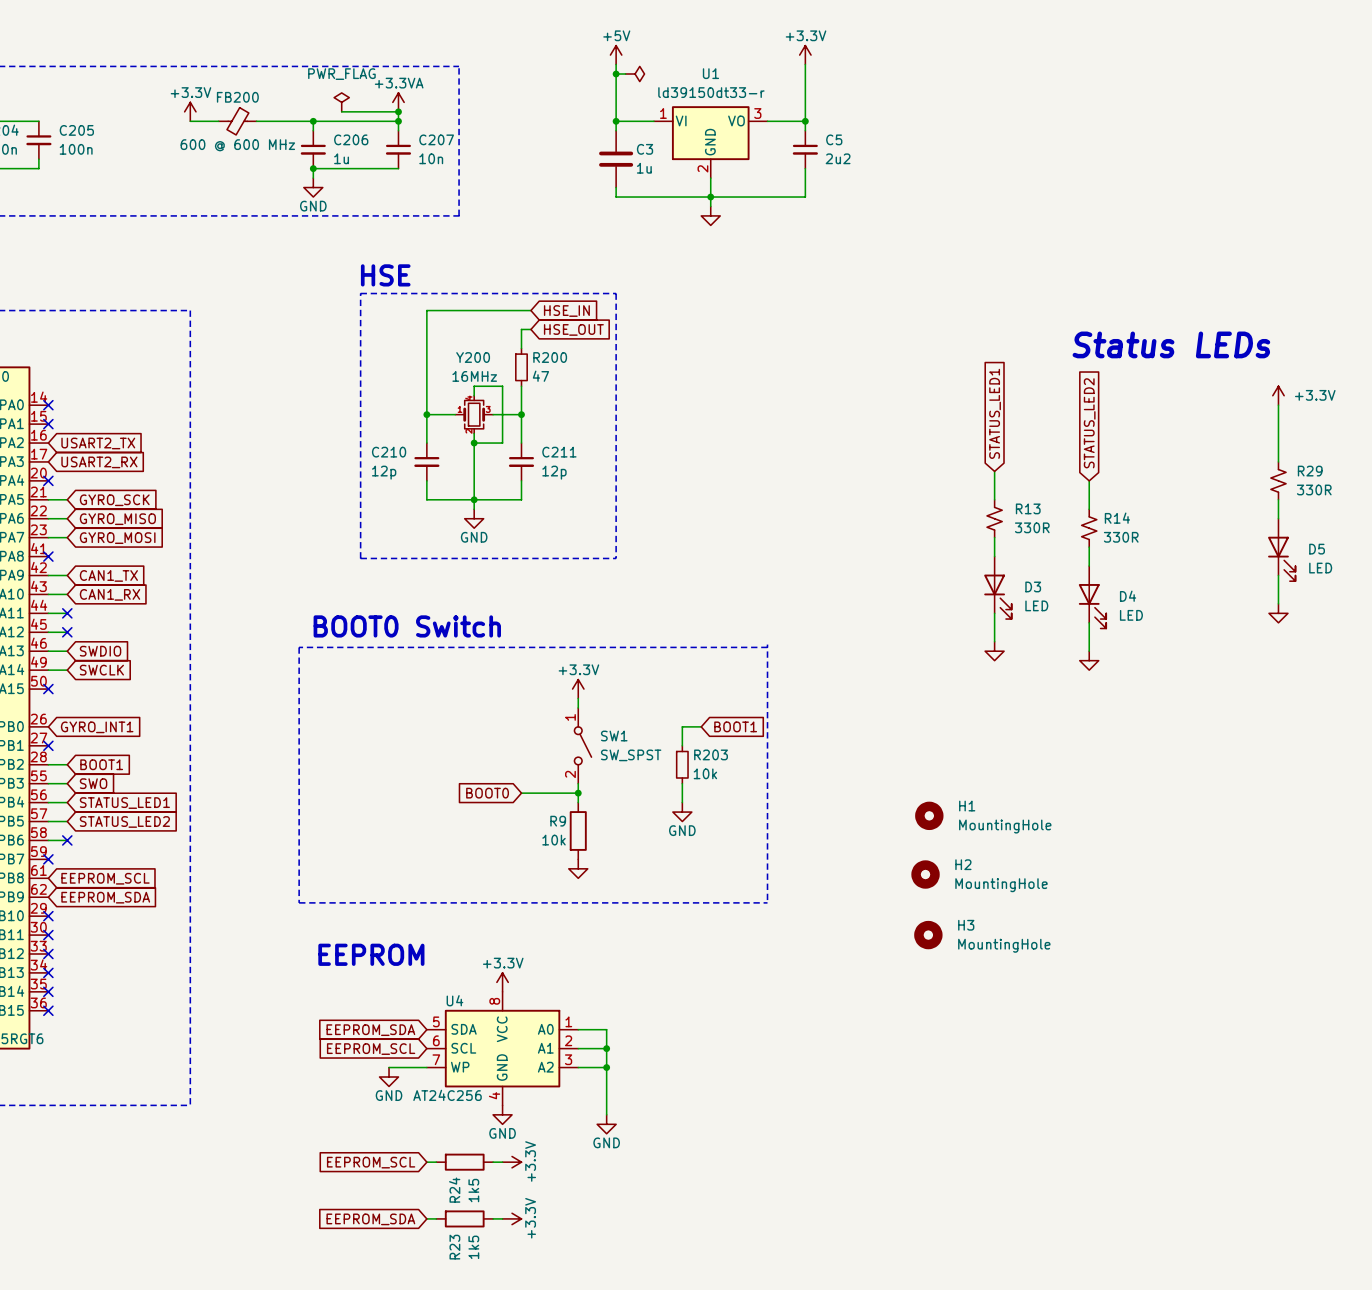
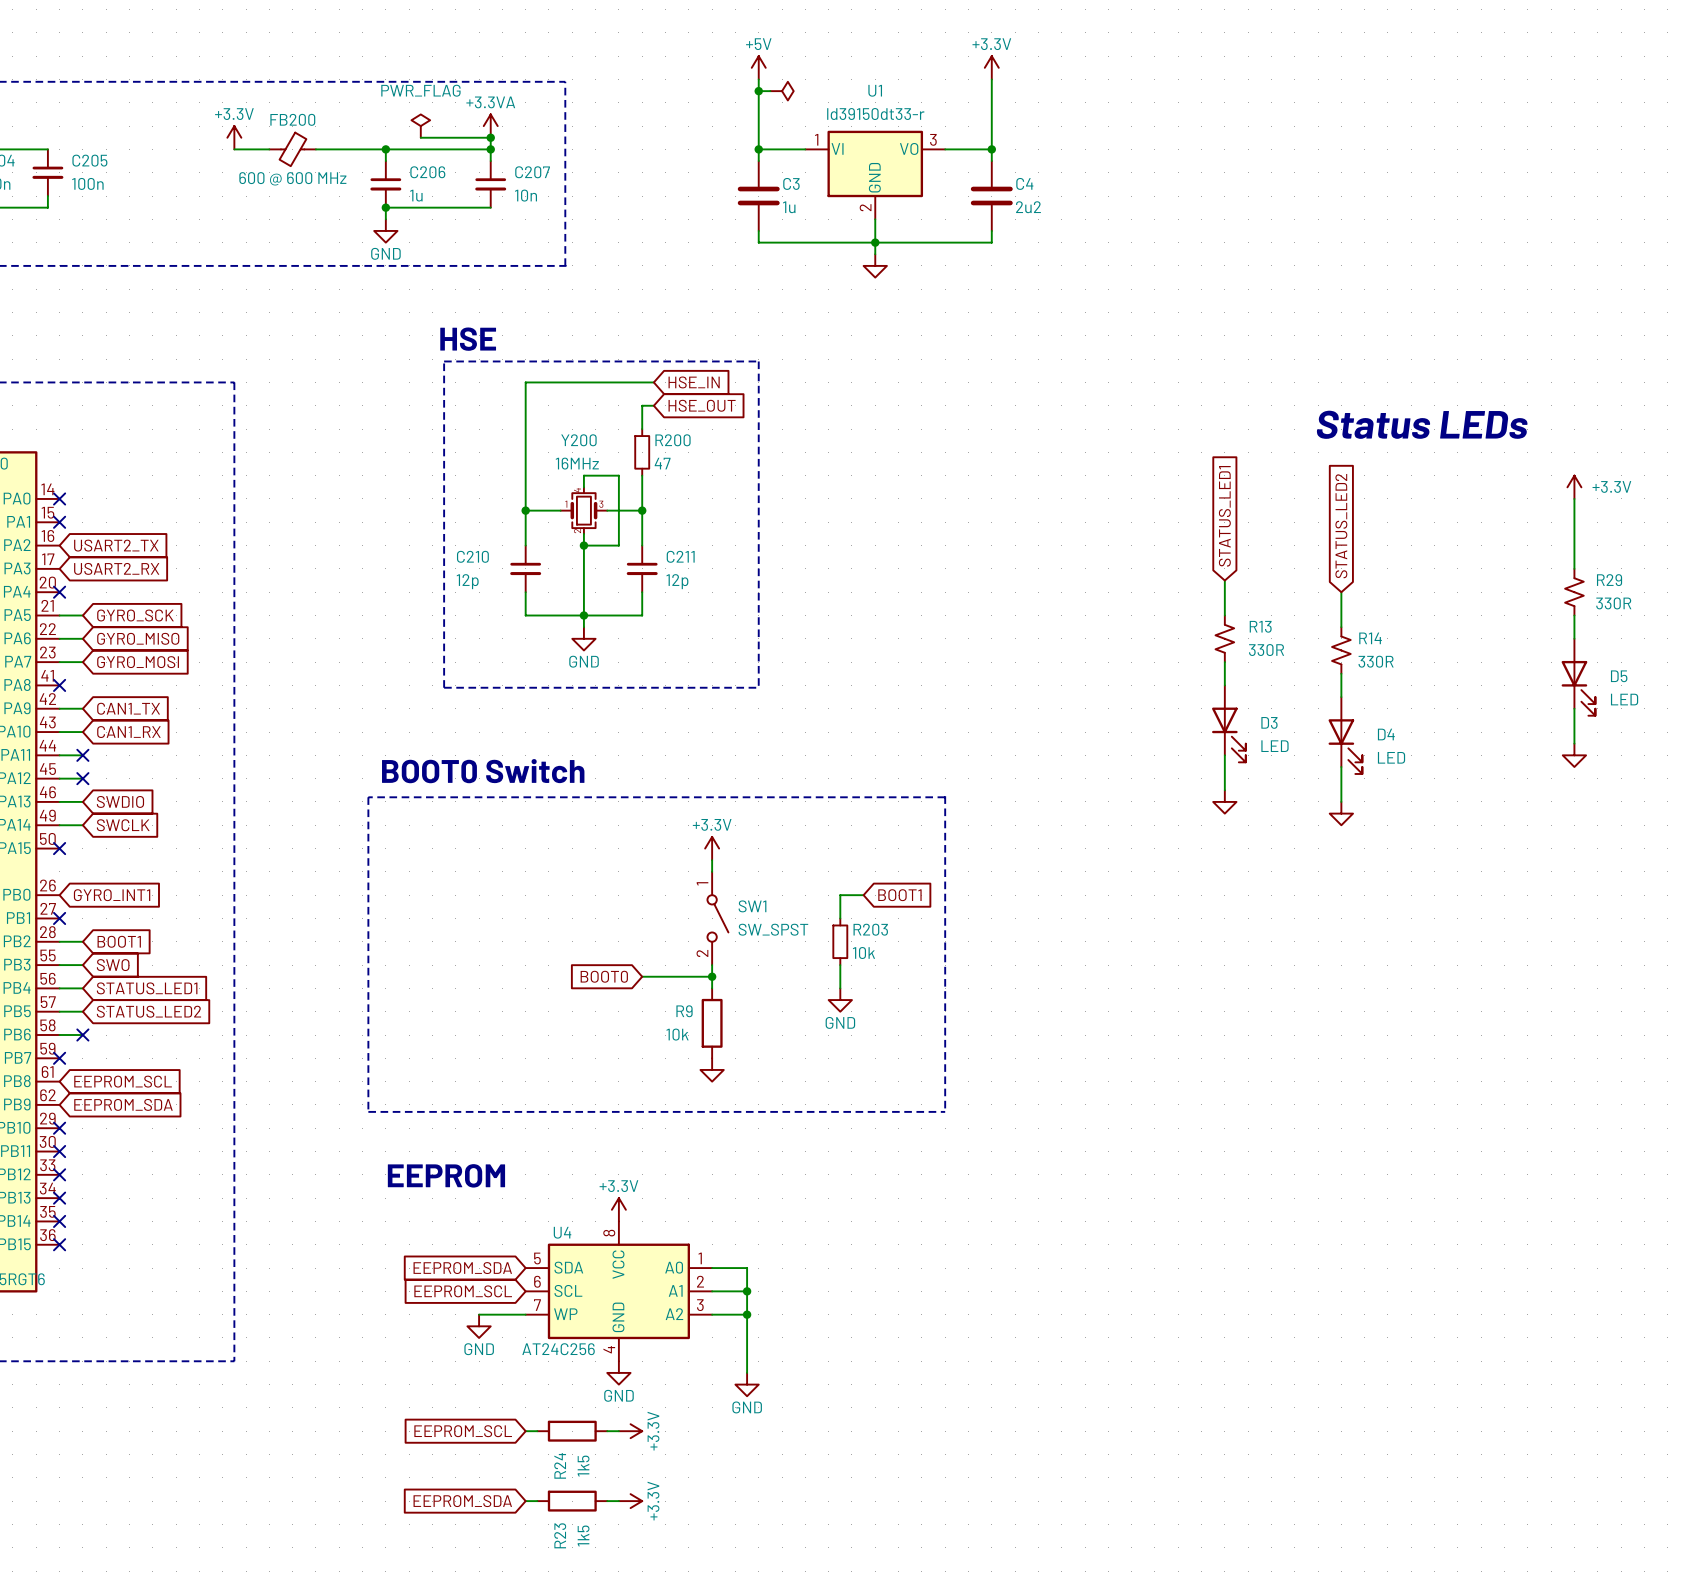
C5: 2u2 (805, 149) -> none
C4: none -> 2u2 (991, 196)
H1: MountingHole (929, 815) -> none
H2: MountingHole (925, 874) -> none
H3: MountingHole (928, 935) -> none

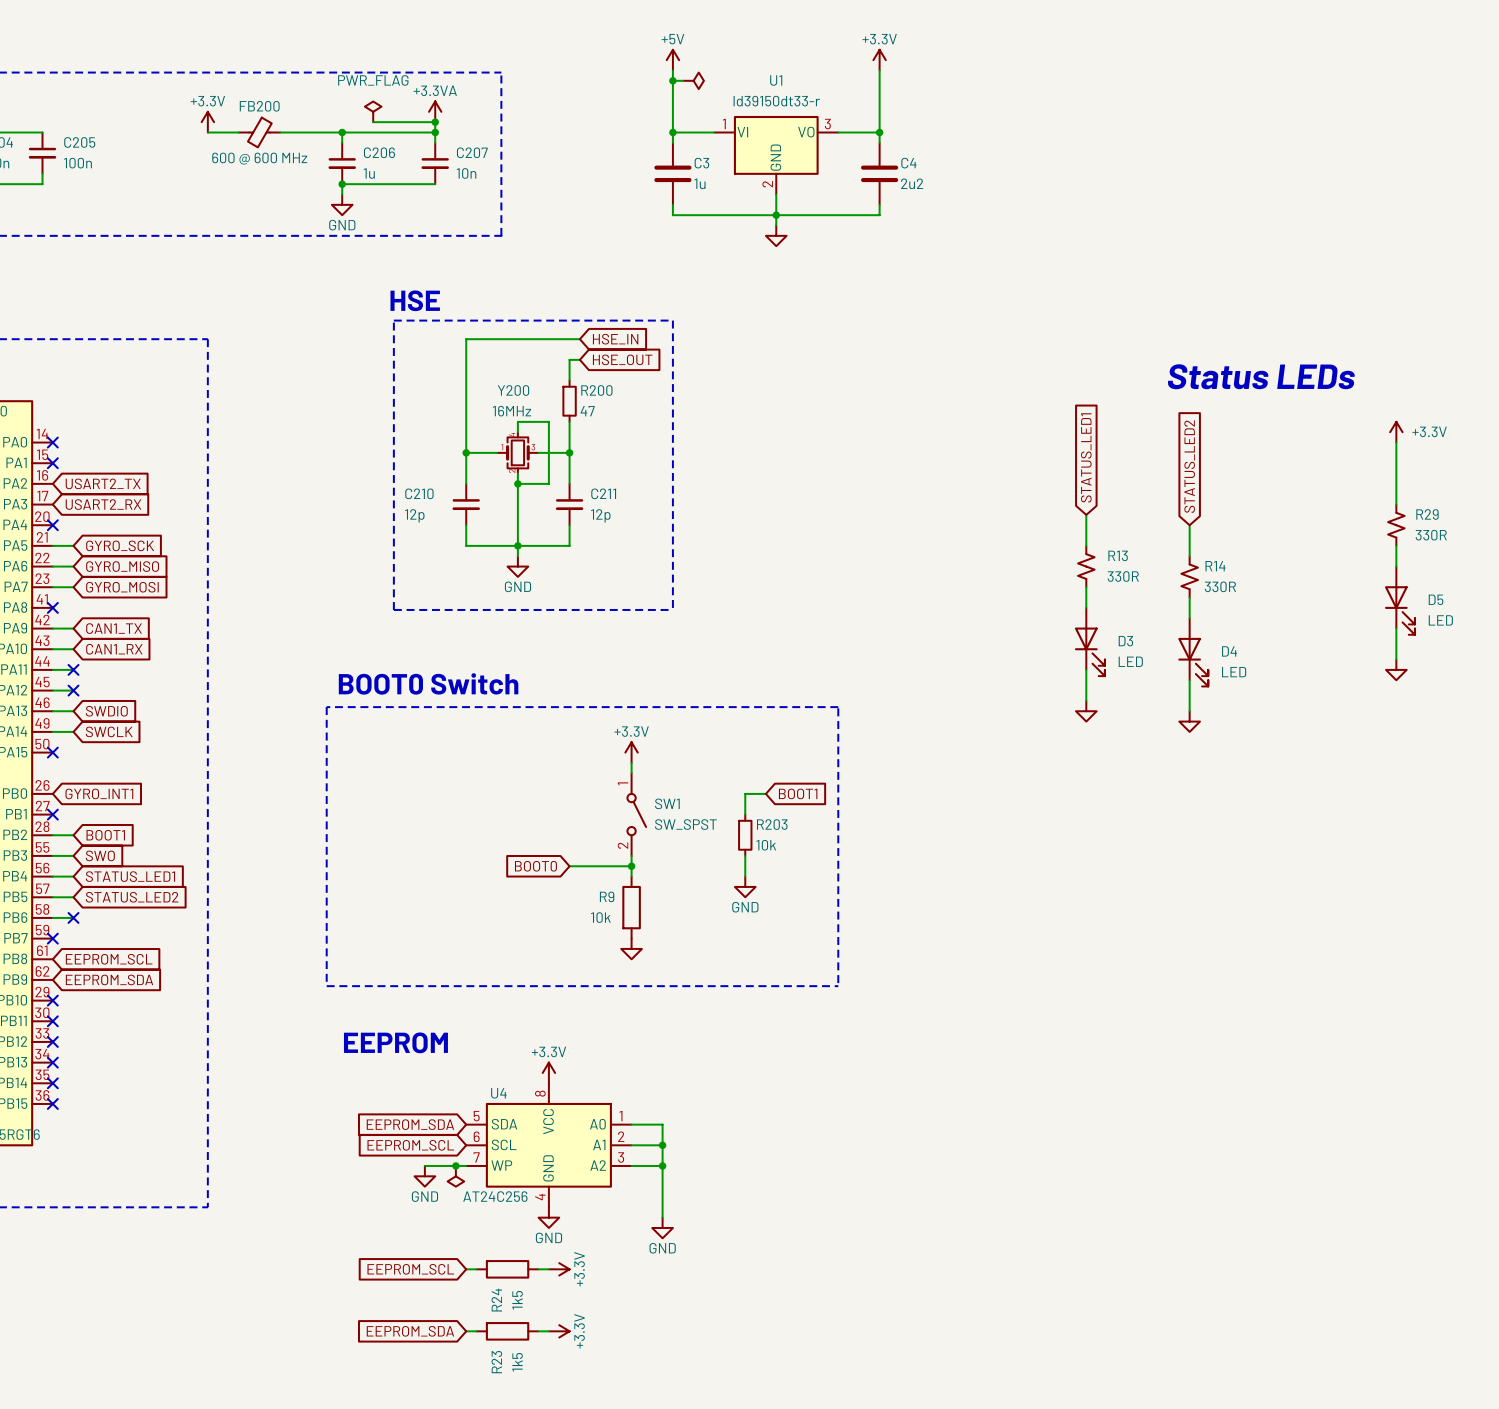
junction: none -> (455, 1165)
power symbol: none -> (455, 1176)

